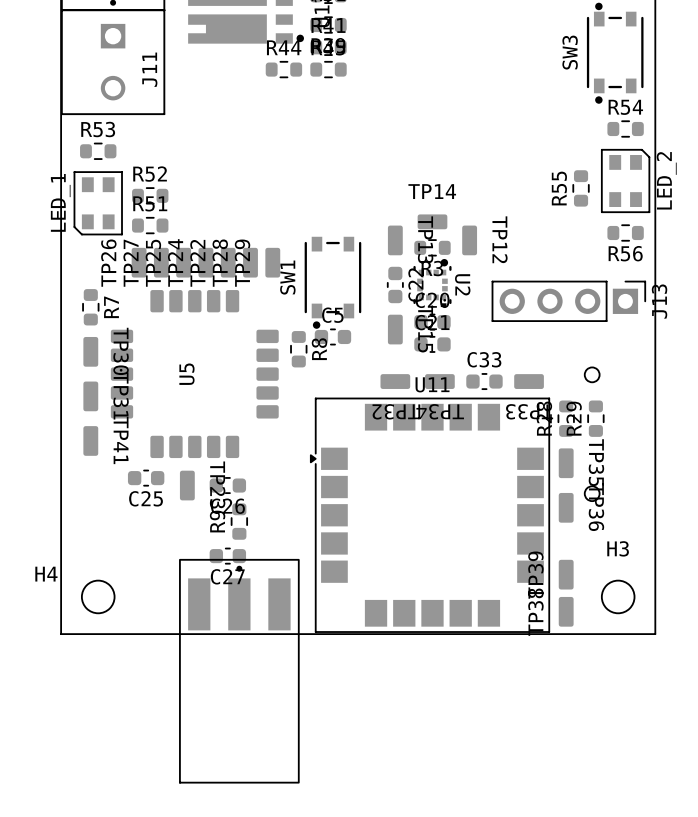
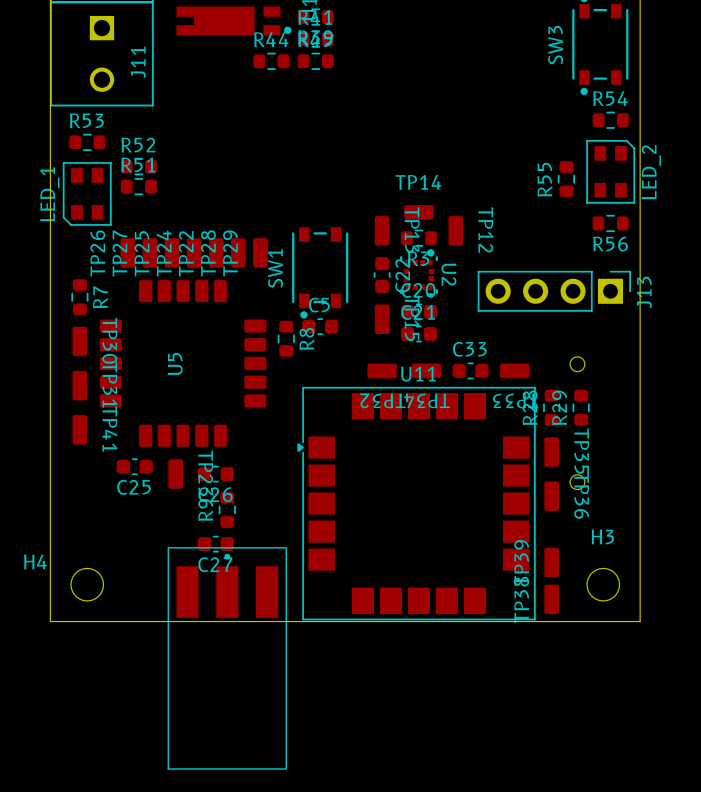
R52 name: R52 (150, 174) -> R51 (138, 164)
R52: none -> (138, 166)
R51: (150, 225) -> none

